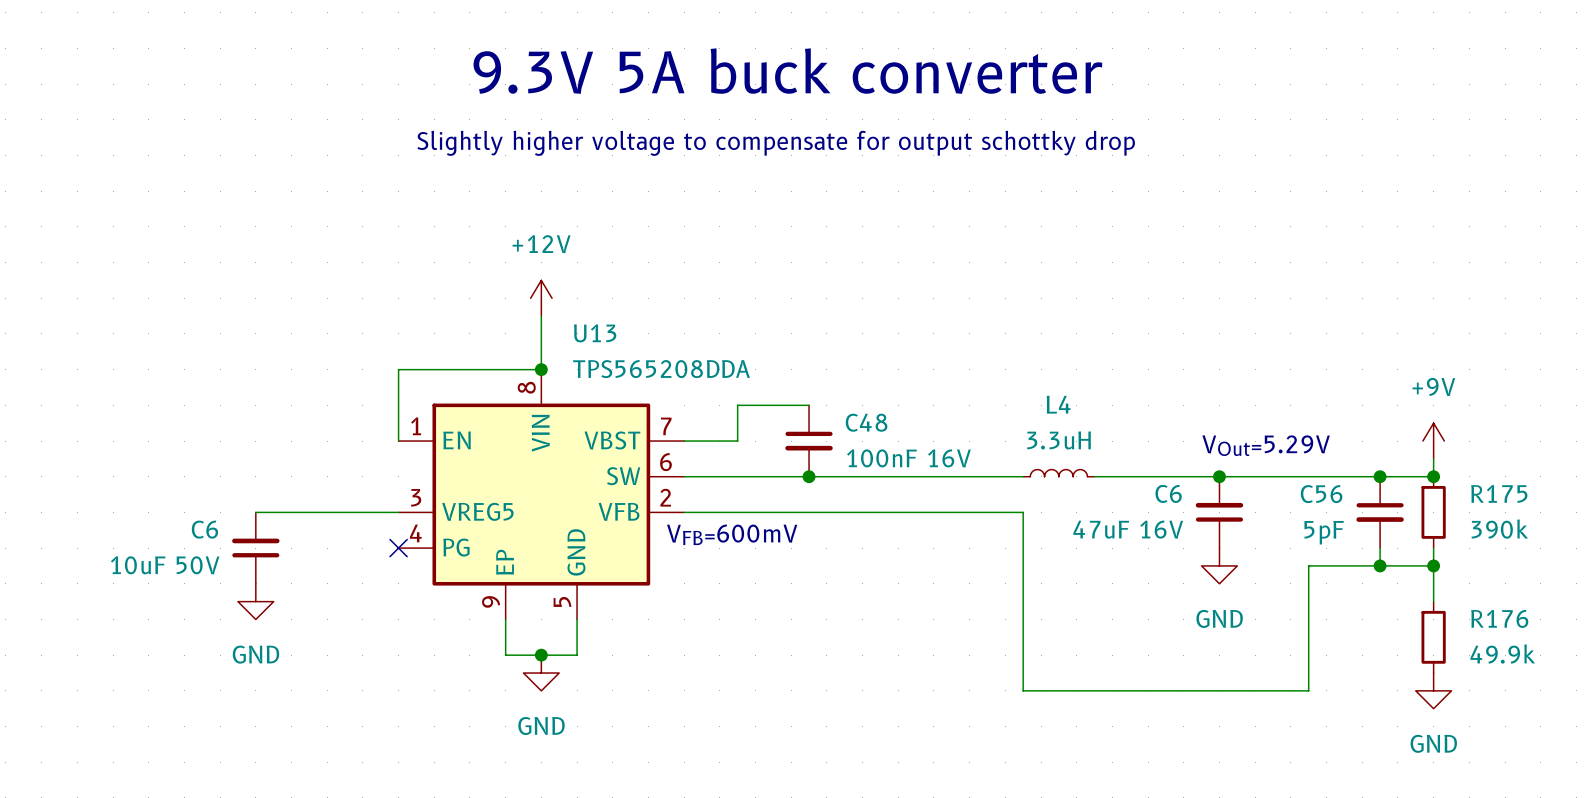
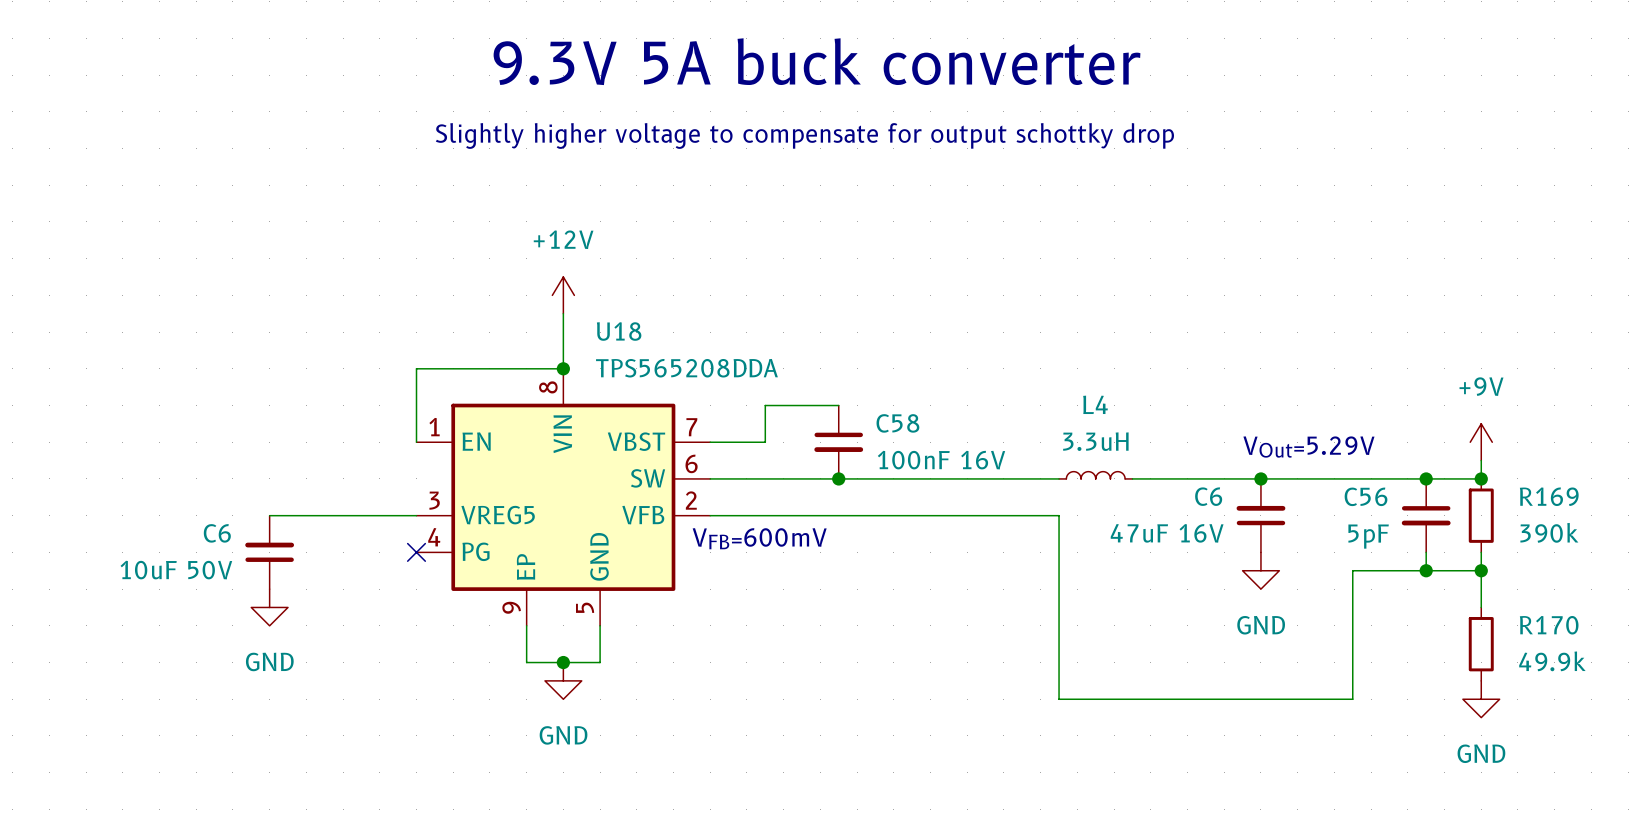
U13 name: U13 (595, 333) -> U18 (619, 331)
C48 name: C48 (866, 422) -> C58 (897, 423)
R175 name: R175 (1499, 493) -> R169 (1549, 496)
R176 name: R176 (1499, 618) -> R170 (1549, 625)

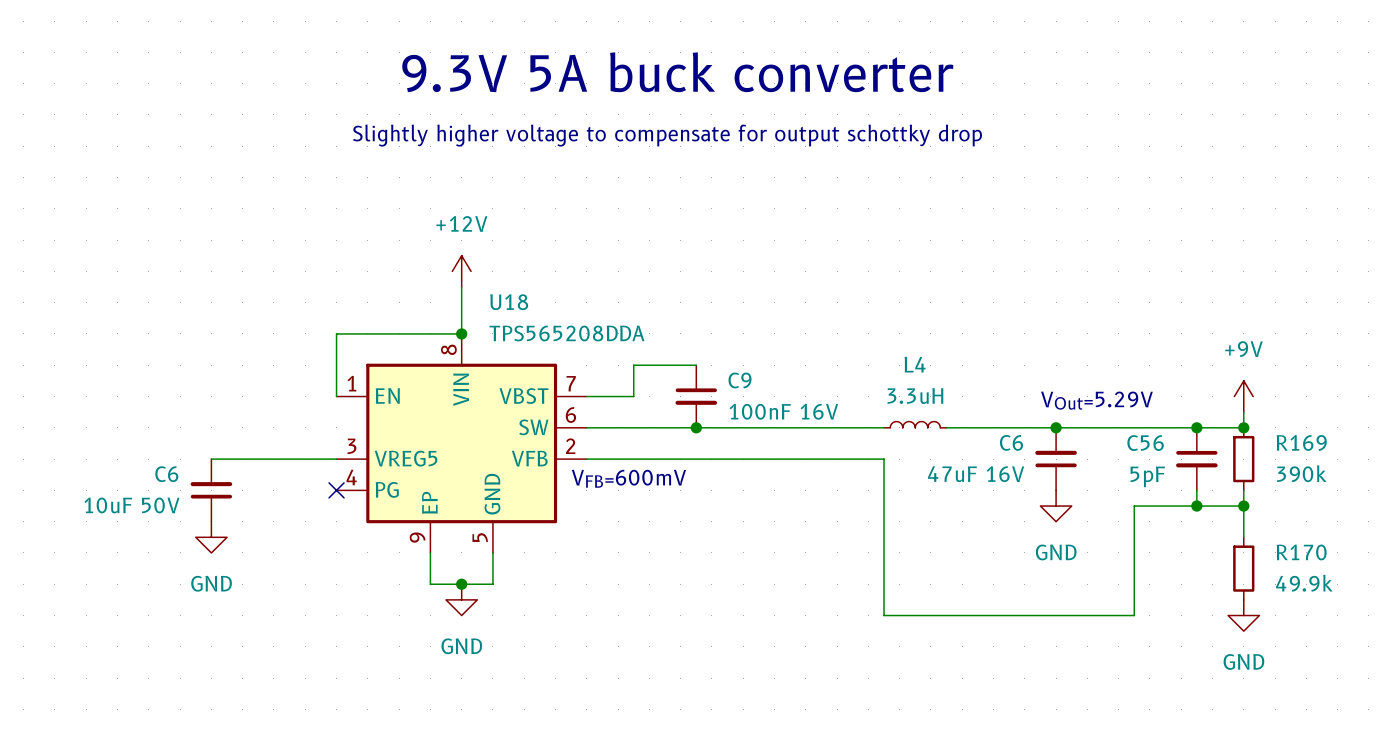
C58 name: C58 (897, 423) -> C9 (740, 380)

